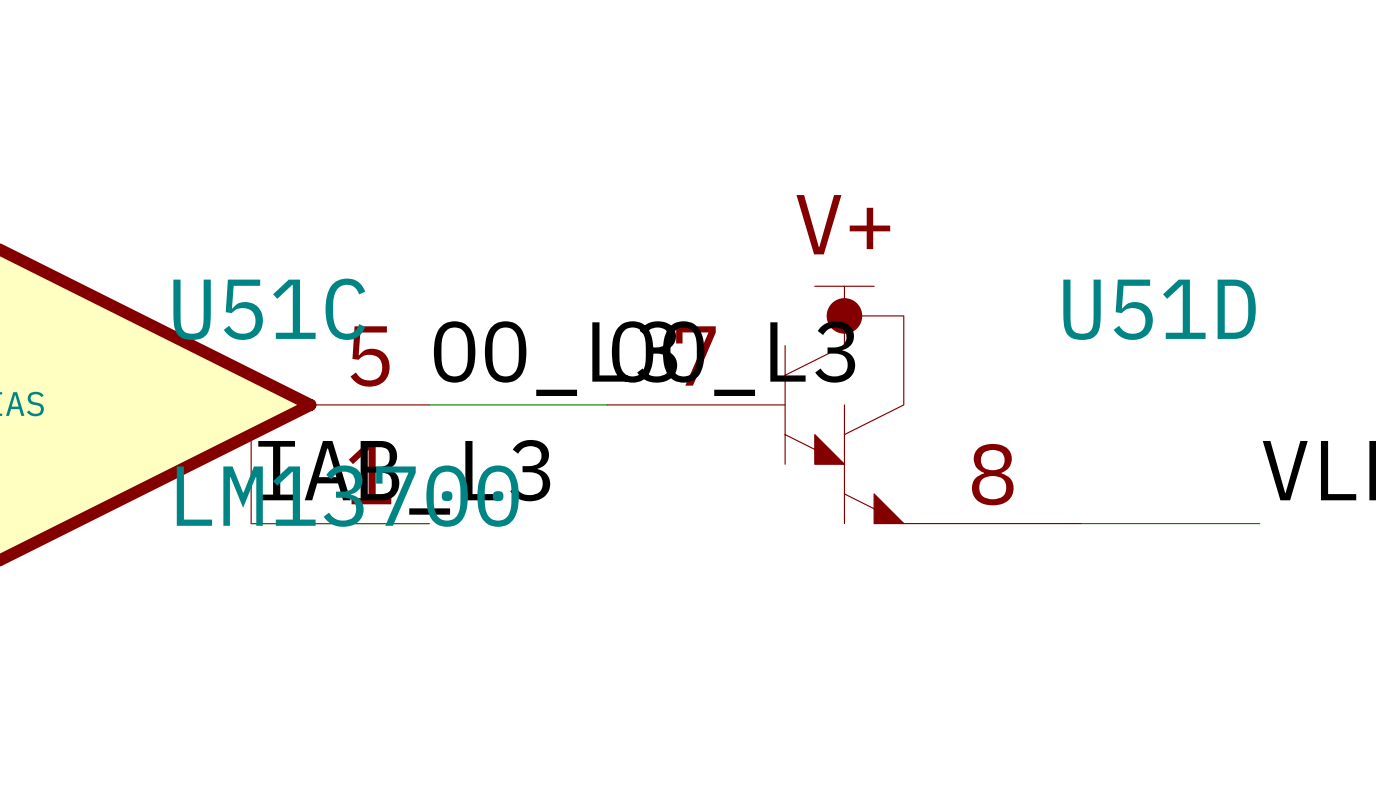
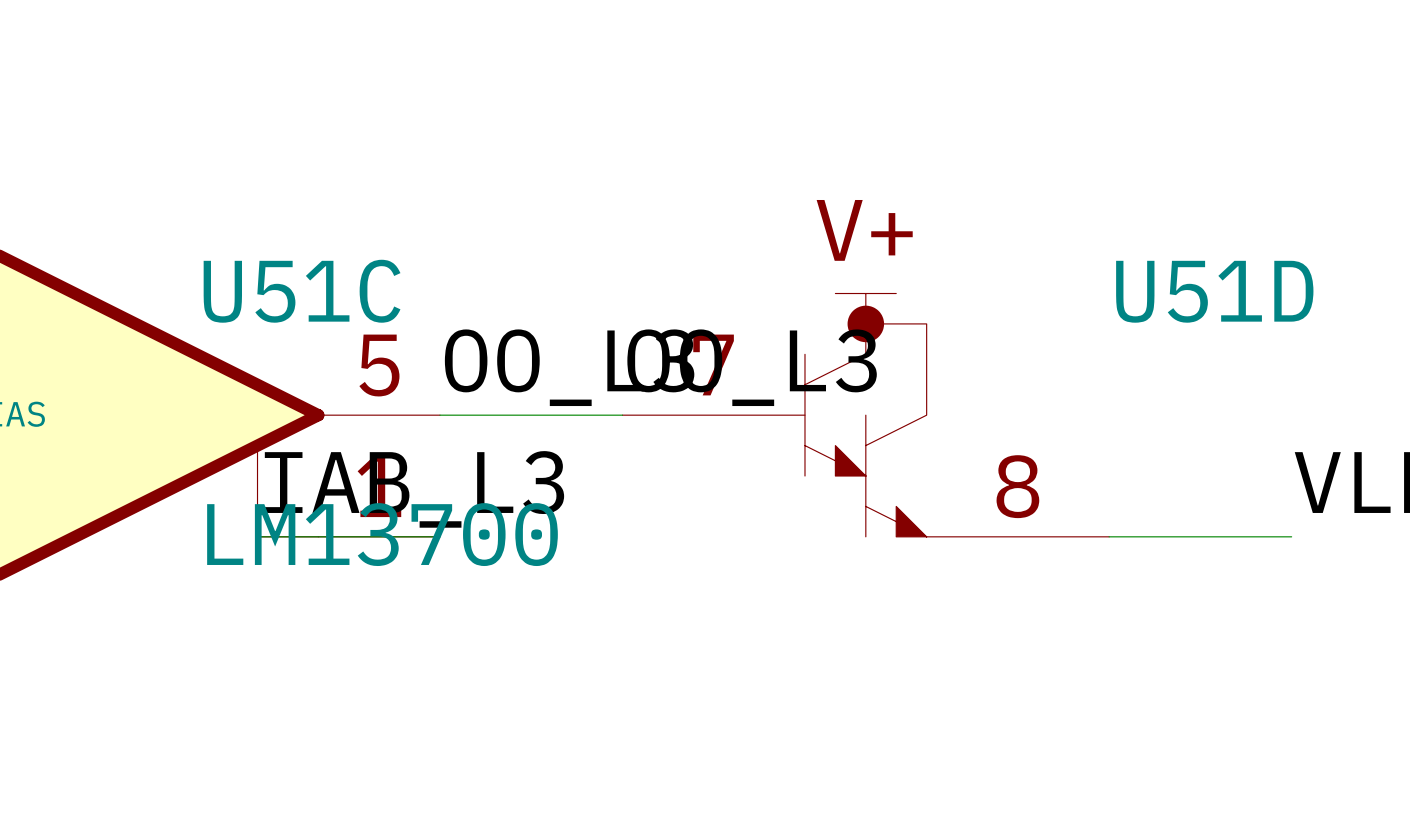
U51C name position: U51C (269, 309) -> U51C (302, 291)
U51D name position: U51D (1159, 309) -> U51D (1214, 291)
U51C value position: LM13700 (347, 496) -> LM13700 (382, 534)

